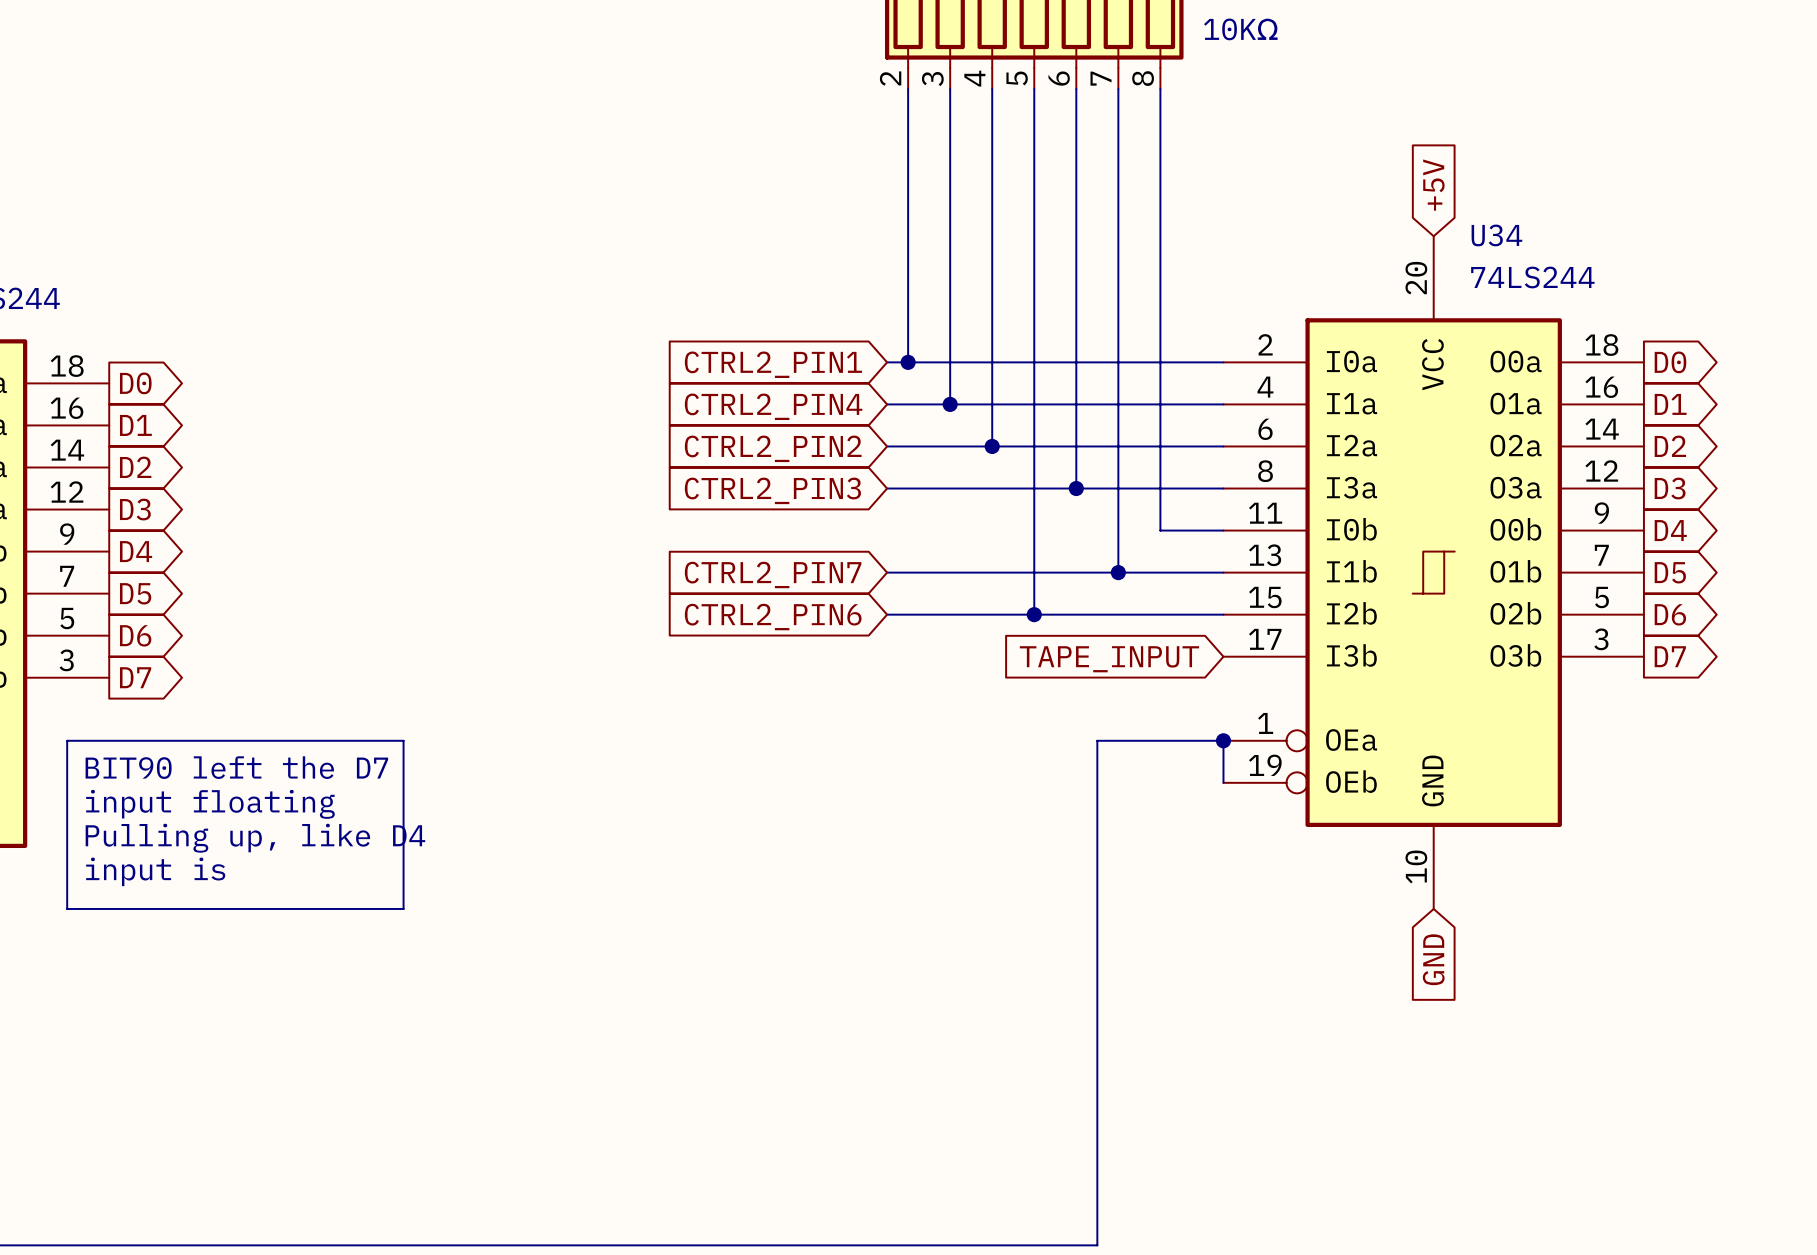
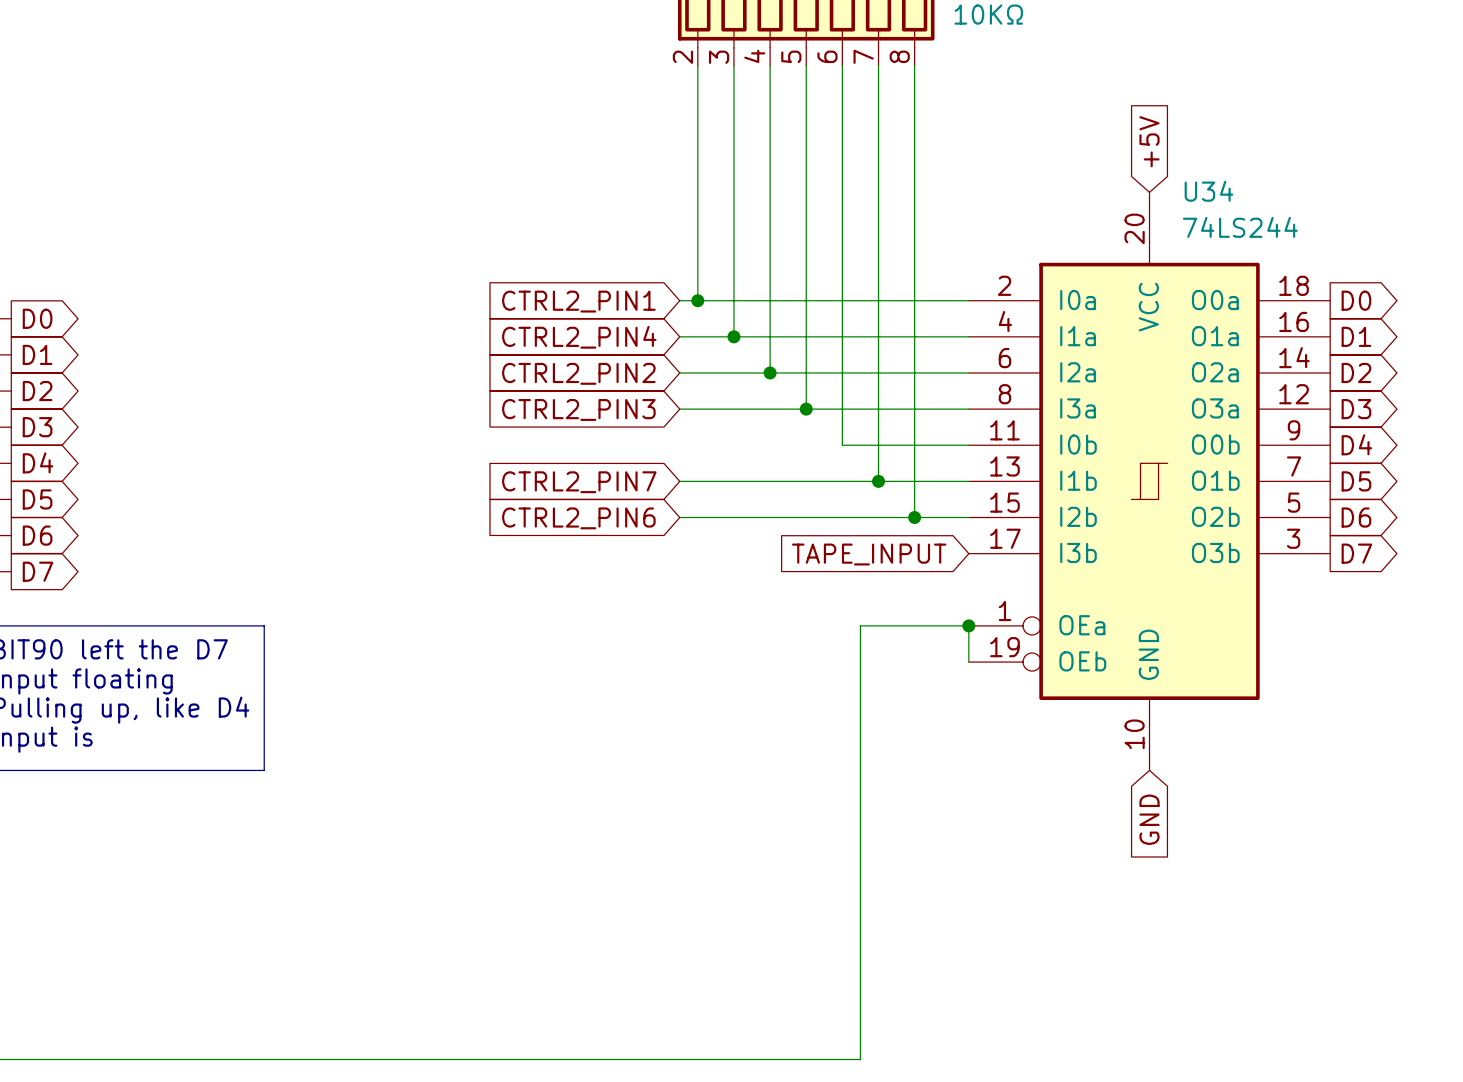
wire: (1034, 488) (1034, 614) -> none
wire: none -> (842, 409) (842, 445) (914, 445) (914, 517)
junction position: (1076, 488) -> (806, 409)
junction: (1034, 614) -> none
junction: none -> (914, 517)

